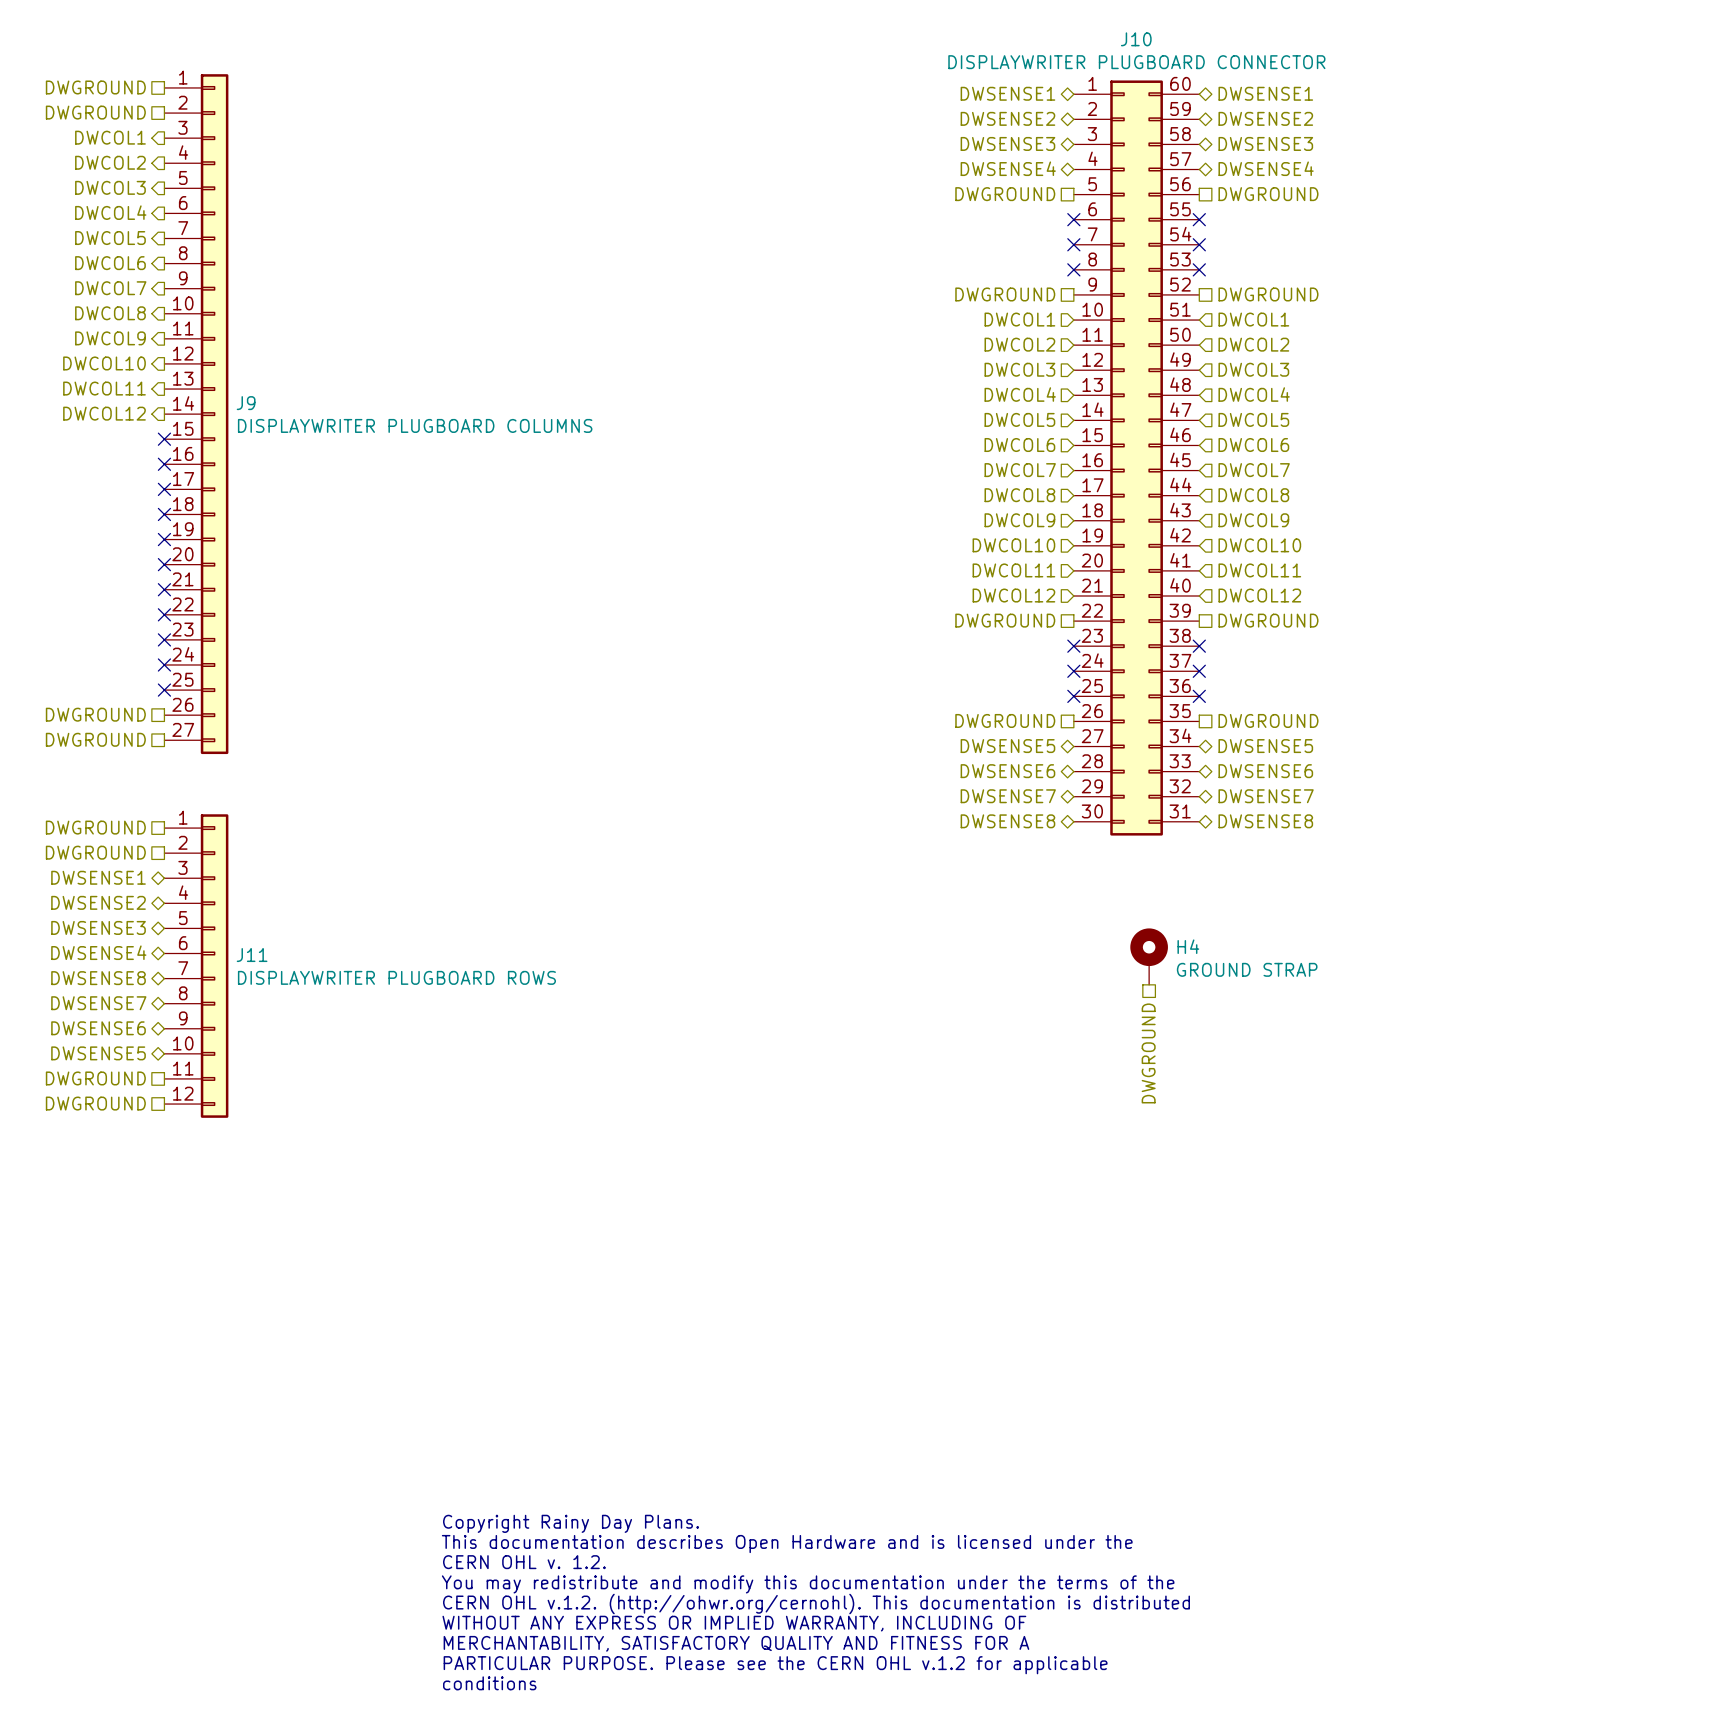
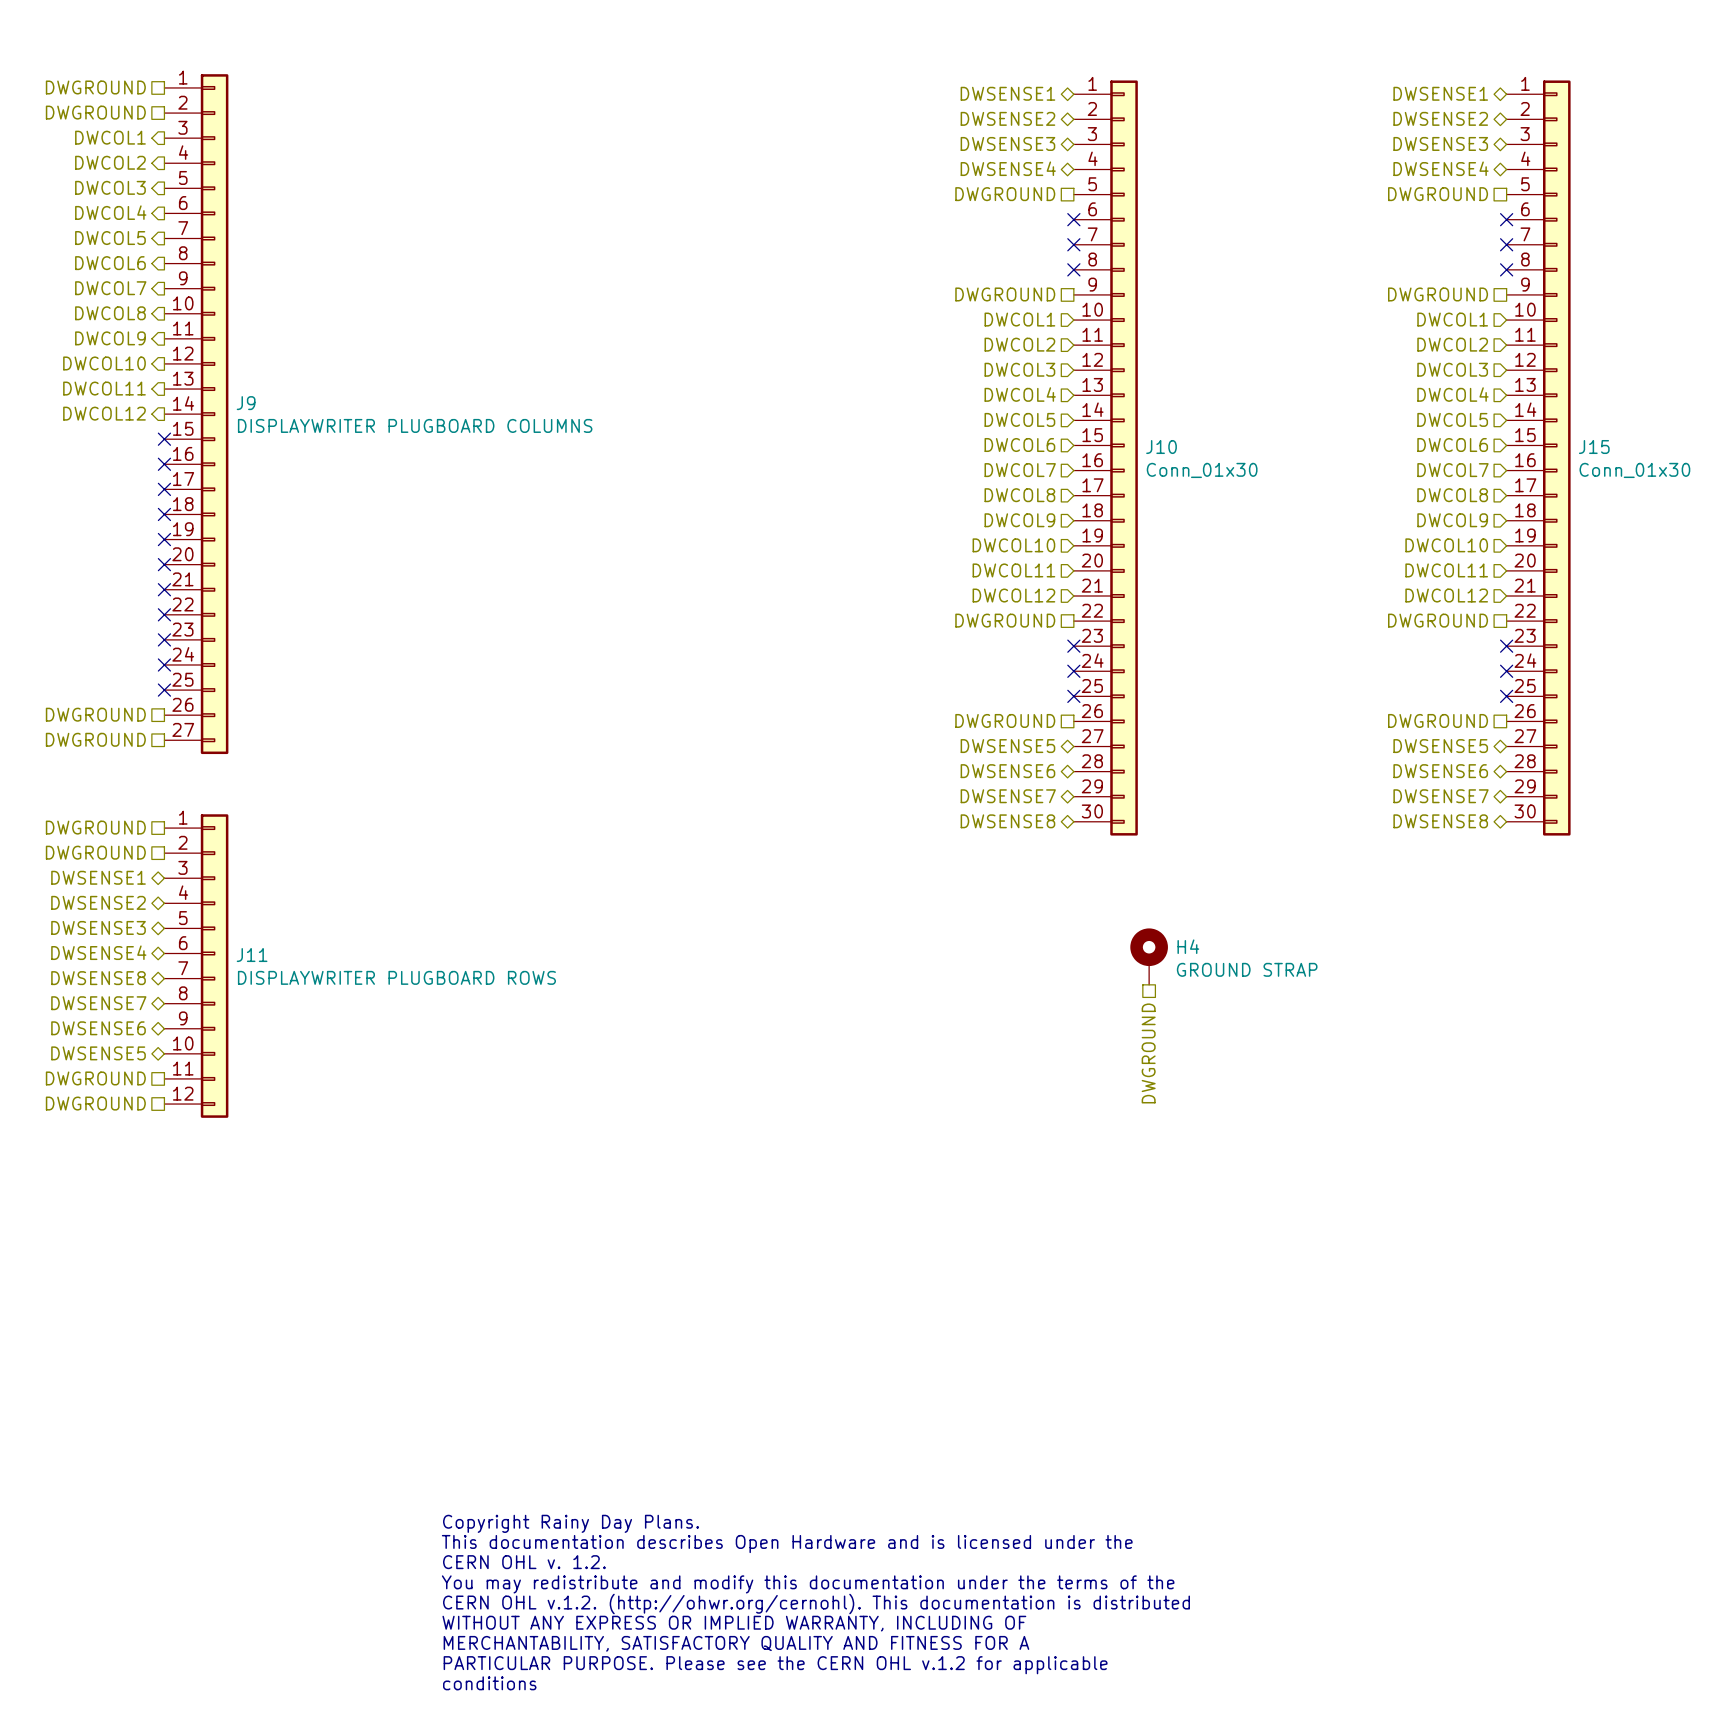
J10 name position: J10 (1136, 39) -> J10 (1161, 447)
J10 value: DISPLAYWRITER PLUGBOARD CONNECTOR (1136, 62) -> Conn_01x30 (1202, 470)
J10 symbol: [1073, 80, 1200, 836] -> [1073, 80, 1138, 836]
hierarchical label: DWSENSE1 (1265, 93) -> none
hierarchical label: none -> DWSENSE1 (1440, 93)
hierarchical label: DWSENSE2 (1265, 118) -> none
hierarchical label: none -> DWSENSE2 (1440, 118)
hierarchical label: DWSENSE3 (1265, 143) -> none
hierarchical label: none -> DWSENSE3 (1440, 143)
hierarchical label: DWSENSE4 (1266, 168) -> none
hierarchical label: none -> DWSENSE4 (1441, 168)
hierarchical label: DWGROUND (1268, 194) -> none
hierarchical label: none -> DWGROUND (1438, 194)
no-connect mark: (1199, 219) -> none
no-connect mark: none -> (1506, 219)
no-connect mark: (1199, 244) -> none
no-connect mark: none -> (1506, 244)
no-connect mark: (1199, 269) -> none
no-connect mark: none -> (1506, 269)
hierarchical label: DWGROUND (1268, 294) -> none
hierarchical label: none -> DWGROUND (1438, 294)
hierarchical label: DWCOL1 (1253, 319) -> none
hierarchical label: none -> DWCOL1 (1452, 319)
hierarchical label: DWCOL2 (1253, 344) -> none
hierarchical label: none -> DWCOL2 (1452, 344)
hierarchical label: DWCOL3 (1253, 369) -> none
hierarchical label: none -> DWCOL3 (1452, 369)
hierarchical label: DWCOL4 (1254, 394) -> none
hierarchical label: none -> DWCOL4 (1452, 394)
hierarchical label: DWCOL5 (1253, 419) -> none
hierarchical label: none -> DWCOL5 (1452, 419)
hierarchical label: DWCOL6 (1253, 445) -> none
hierarchical label: none -> DWCOL6 (1452, 445)
J15: none -> Conn_01x30 (1538, 458)
hierarchical label: DWCOL7 (1254, 470) -> none
hierarchical label: none -> DWCOL7 (1452, 470)
hierarchical label: DWCOL8 (1253, 495) -> none
hierarchical label: none -> DWCOL8 (1452, 495)
hierarchical label: DWCOL9 (1253, 520) -> none
hierarchical label: none -> DWCOL9 (1452, 520)
hierarchical label: DWCOL10 (1259, 545) -> none
hierarchical label: none -> DWCOL10 (1446, 545)
hierarchical label: DWCOL11 (1259, 570) -> none
hierarchical label: none -> DWCOL11 (1446, 570)
hierarchical label: DWCOL12 (1259, 595) -> none
hierarchical label: none -> DWCOL12 (1446, 595)
hierarchical label: DWGROUND (1268, 620) -> none
hierarchical label: none -> DWGROUND (1438, 620)
no-connect mark: (1199, 646) -> none
no-connect mark: none -> (1506, 646)
no-connect mark: (1199, 671) -> none
no-connect mark: none -> (1506, 671)
no-connect mark: (1199, 696) -> none
no-connect mark: none -> (1506, 696)
hierarchical label: DWGROUND (1268, 720) -> none
hierarchical label: none -> DWGROUND (1438, 720)
hierarchical label: DWSENSE5 (1265, 746) -> none
hierarchical label: none -> DWSENSE5 (1440, 746)
hierarchical label: DWSENSE6 (1265, 771) -> none
hierarchical label: none -> DWSENSE6 (1440, 771)
hierarchical label: DWSENSE7 (1266, 796) -> none
hierarchical label: none -> DWSENSE7 (1441, 796)
hierarchical label: DWSENSE8 (1265, 821) -> none
hierarchical label: none -> DWSENSE8 (1440, 821)

